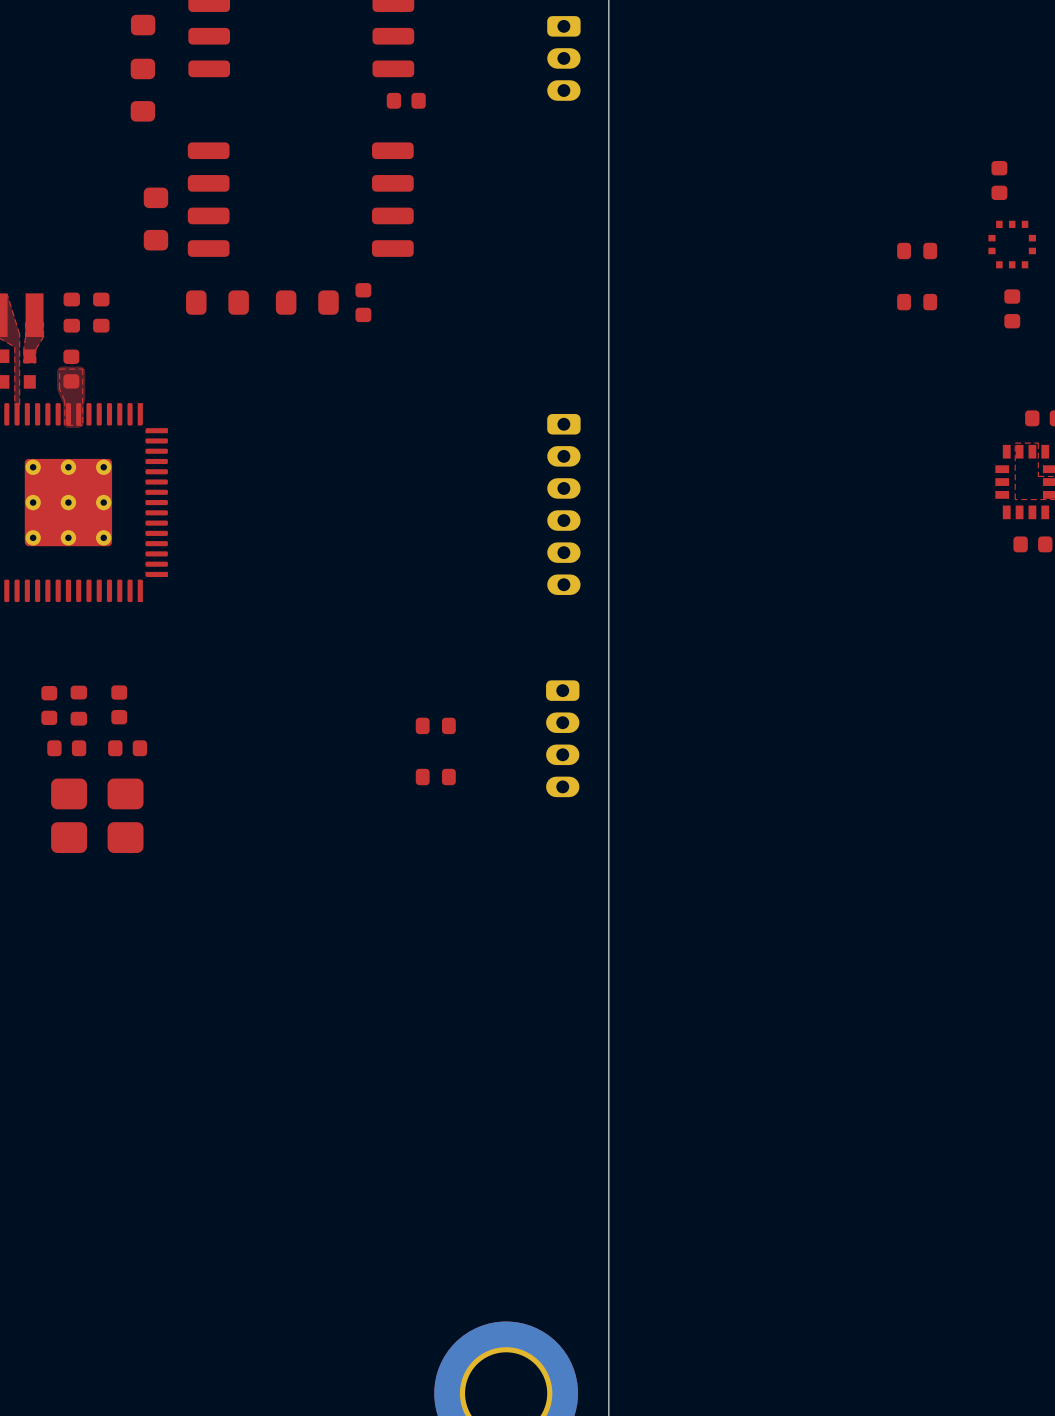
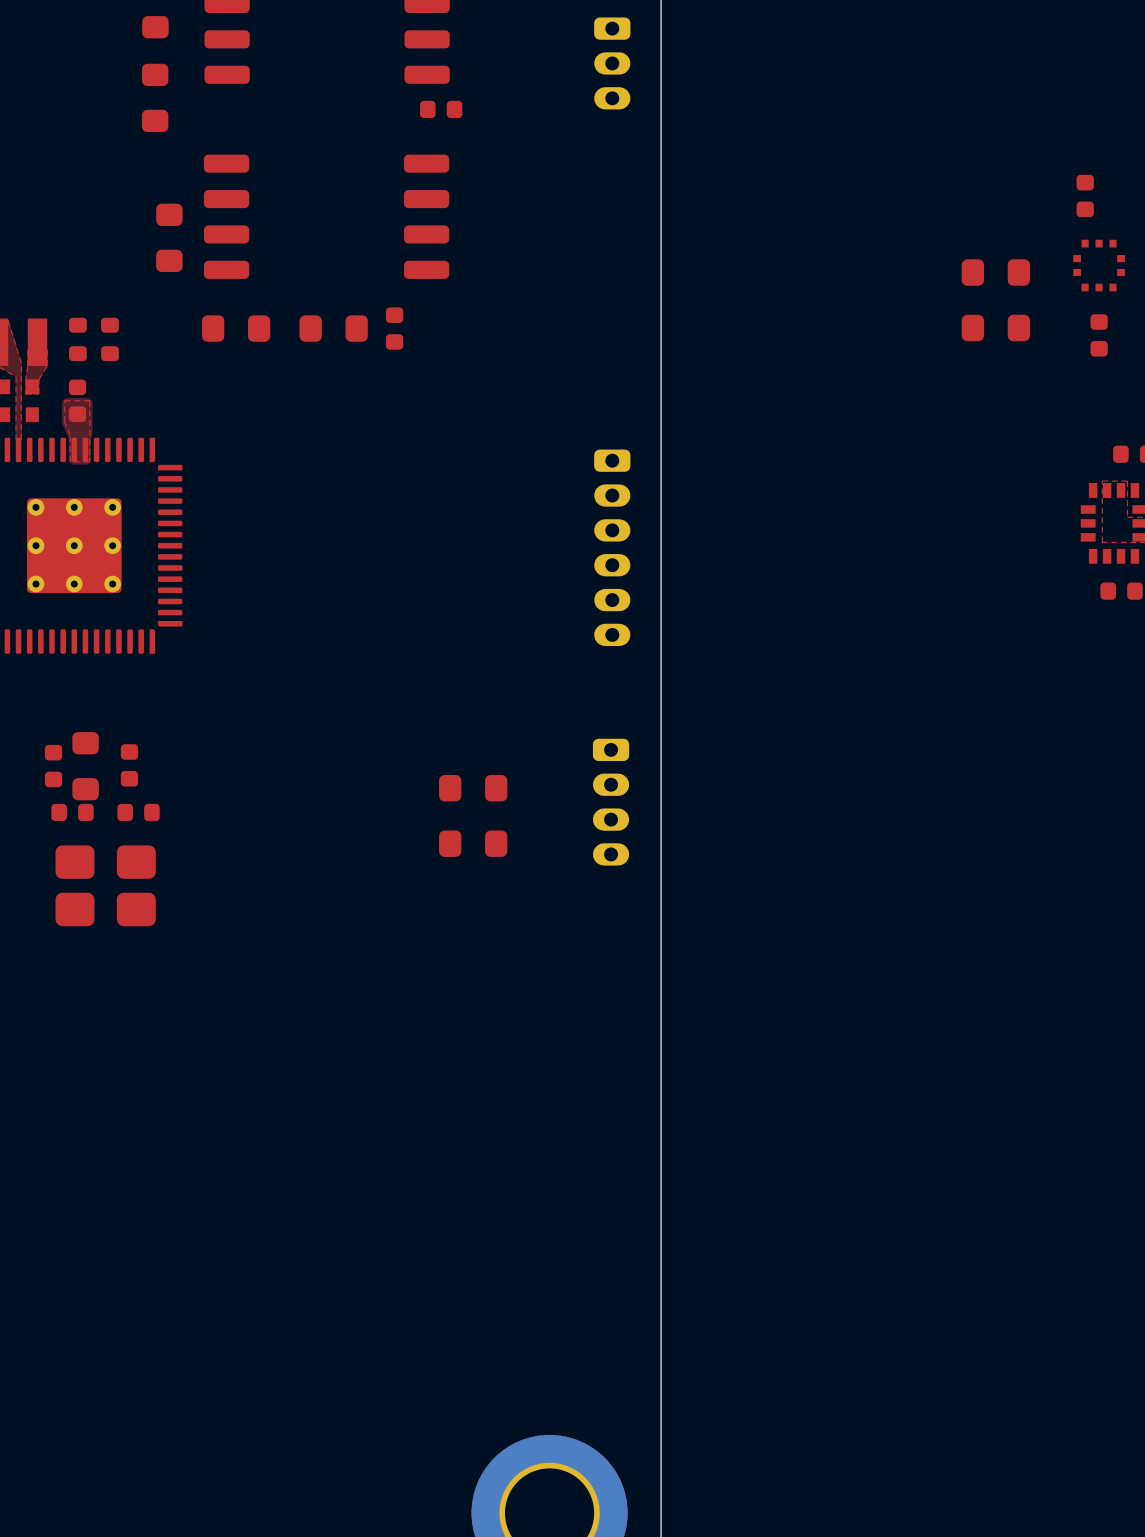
part footprint: [897, 242, 938, 260] -> [961, 259, 1031, 286]
part footprint: [897, 293, 938, 311] -> [961, 314, 1031, 342]
part footprint: [70, 685, 88, 726] -> [72, 732, 99, 801]
part footprint: [415, 717, 456, 735] -> [439, 774, 508, 802]
part footprint: [415, 768, 456, 786] -> [439, 830, 508, 857]

